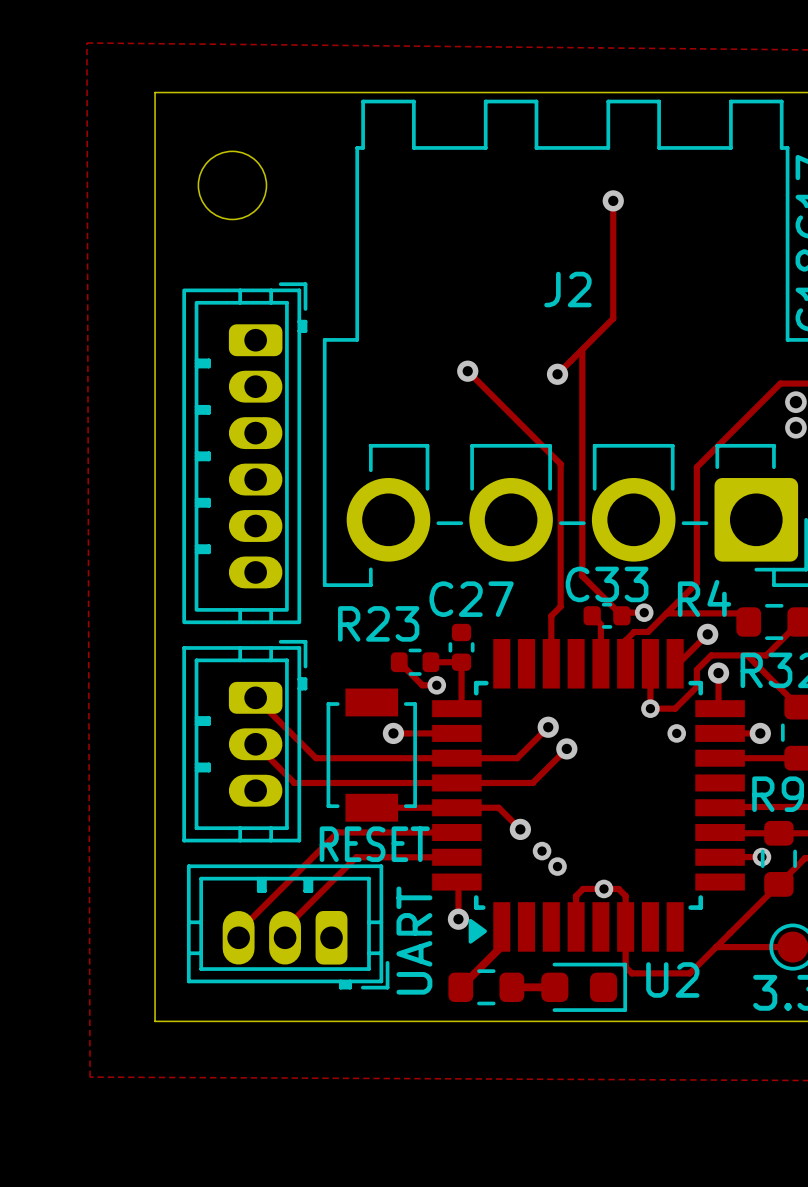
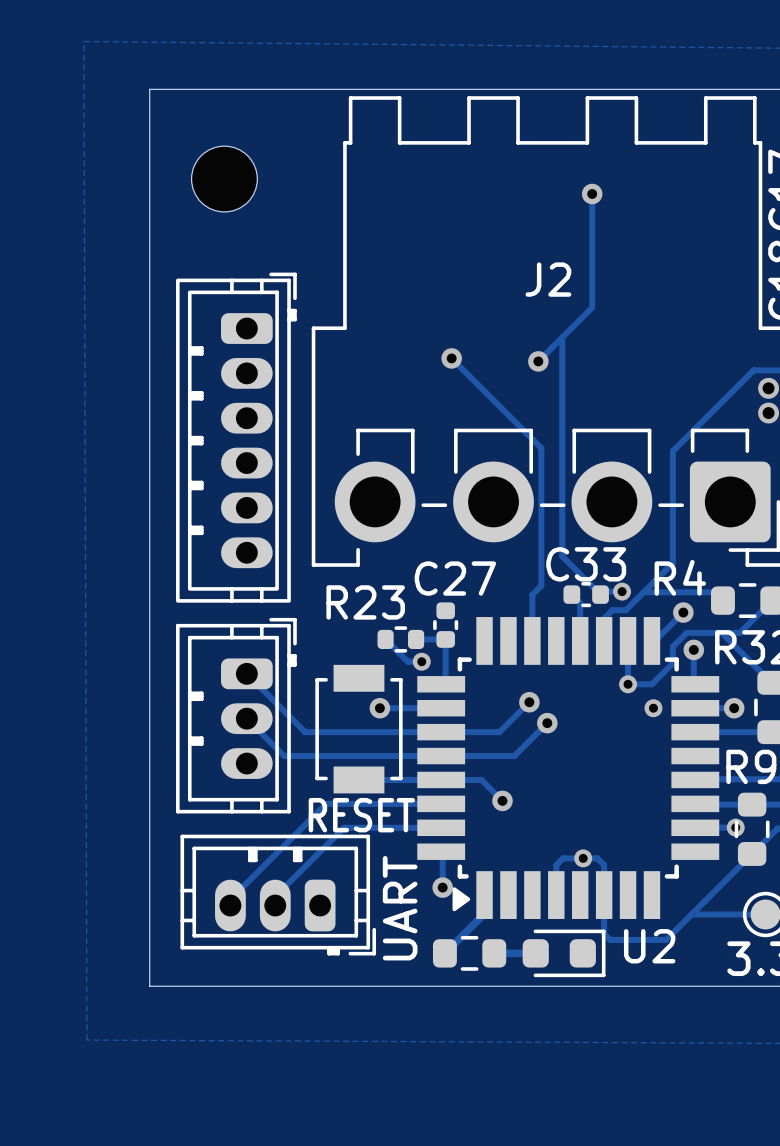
via: (542, 851) -> none
via: (557, 866) -> none

